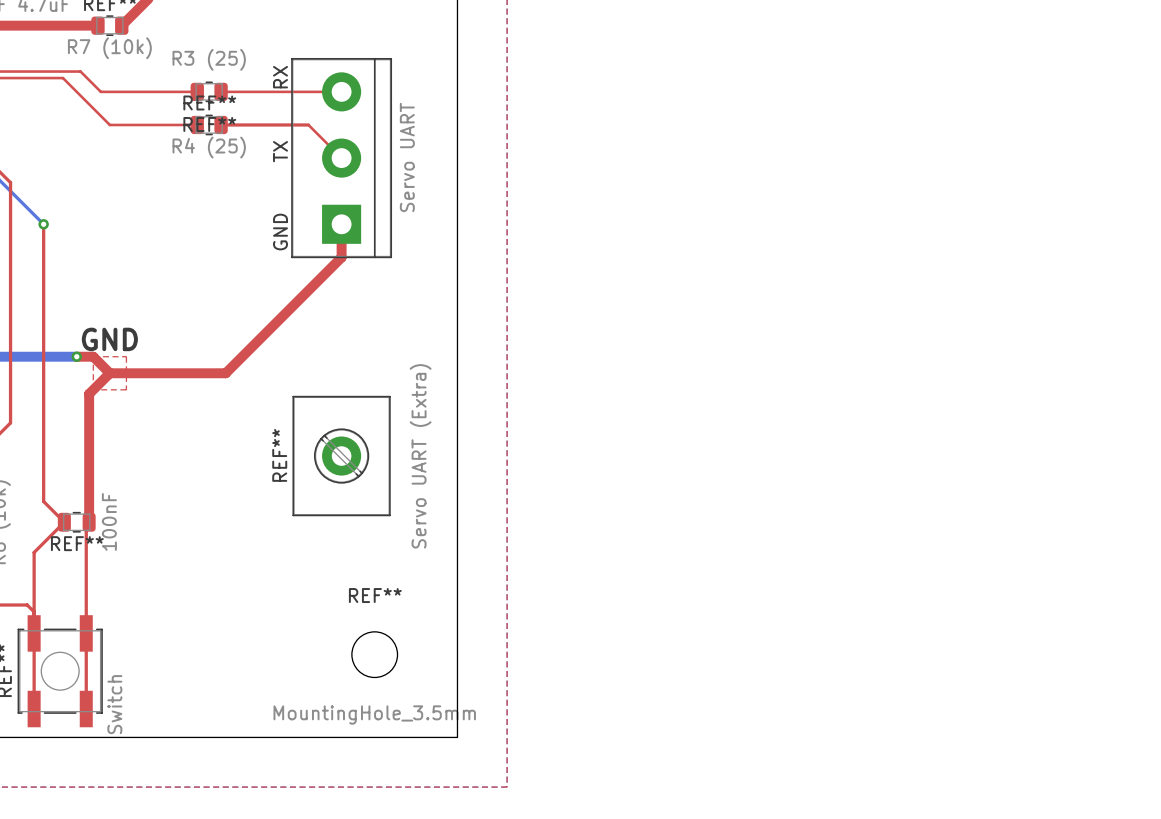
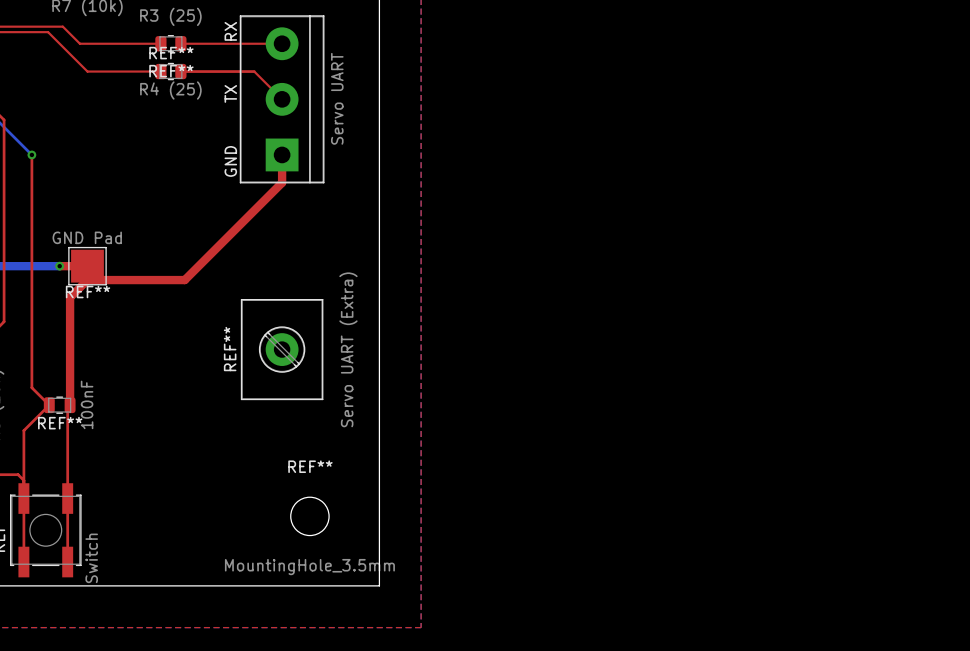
text: GND (109, 339) -> none
top zone outline: (93, 356) (93, 389) (126, 389) (126, 356) (93, 356) -> none
REF**: none -> GND Pad (87, 266)

